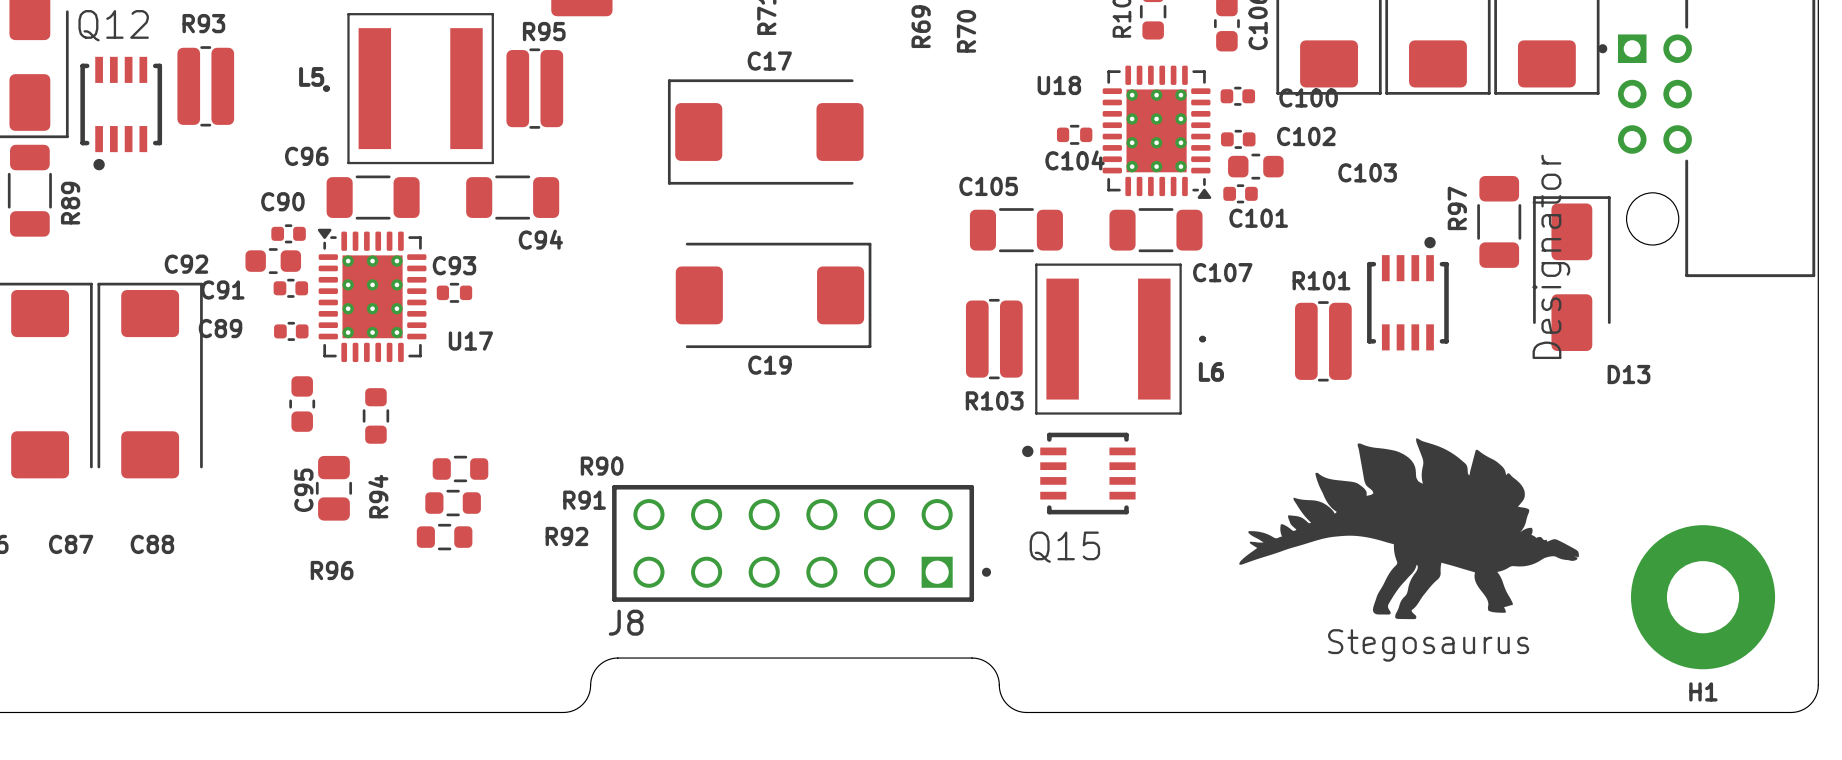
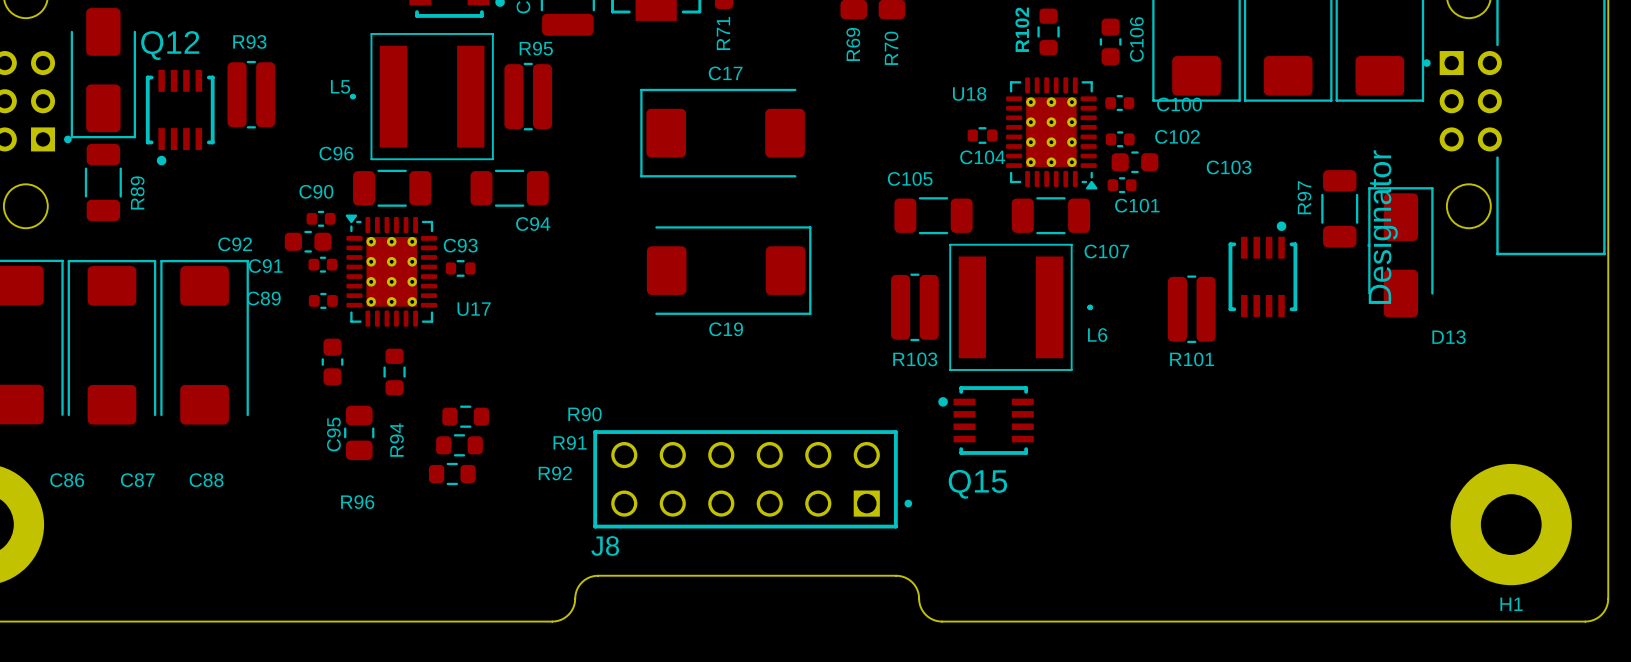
R101 name position: R101 (1321, 280) -> R101 (1192, 359)
drawing: [1239, 438, 1579, 620] -> none
text: Stegosaurus (1428, 645) -> none

